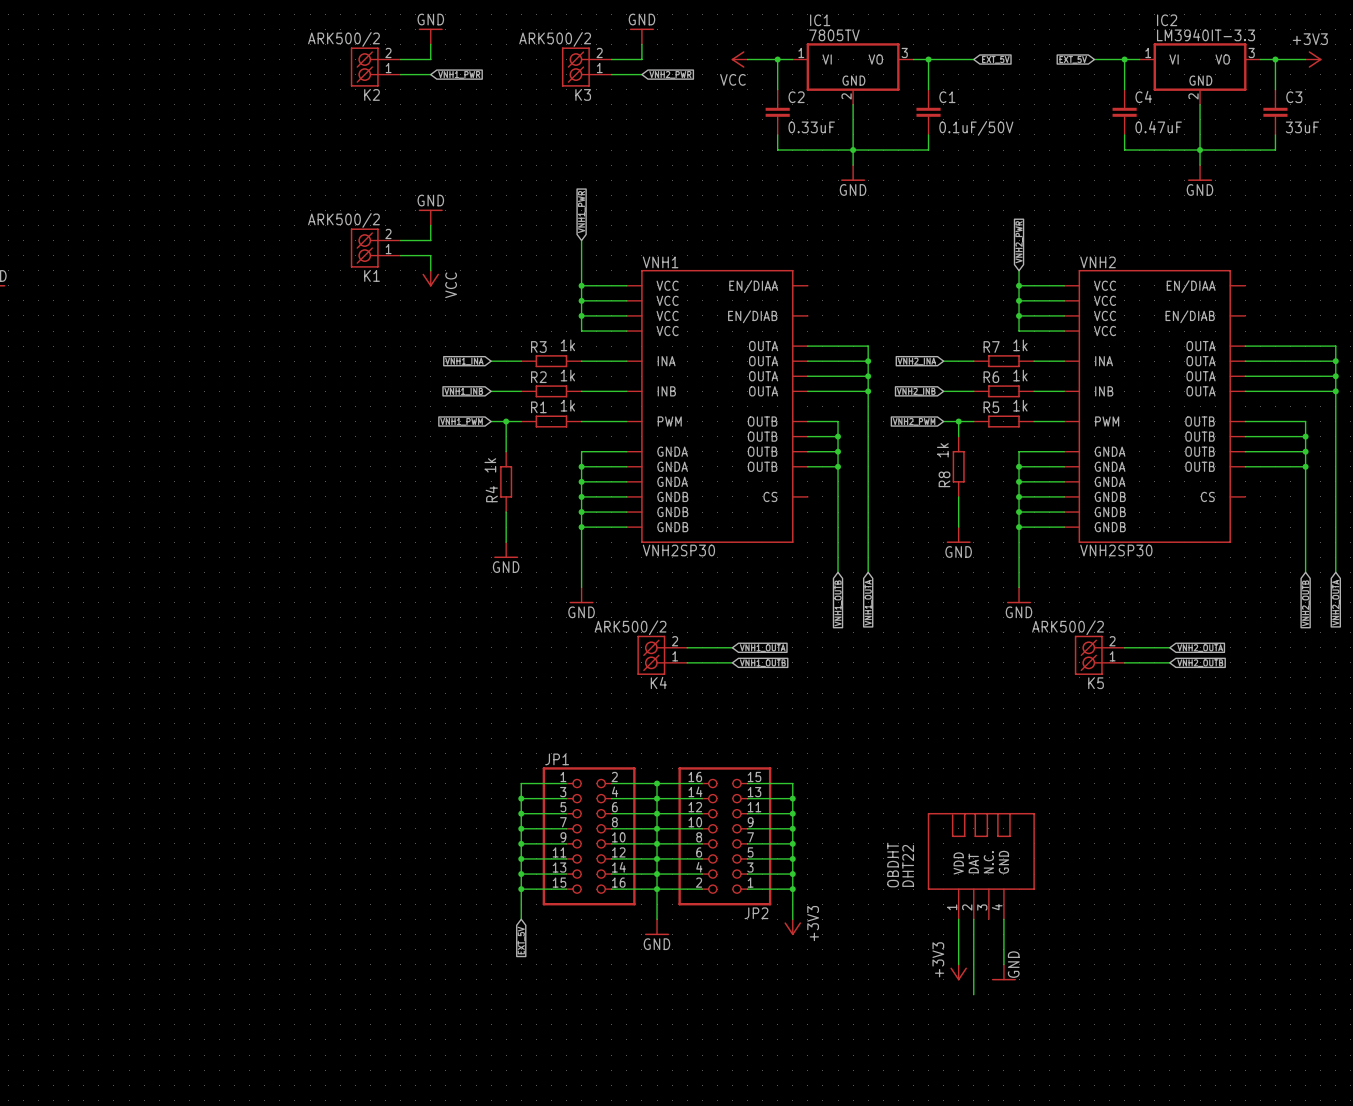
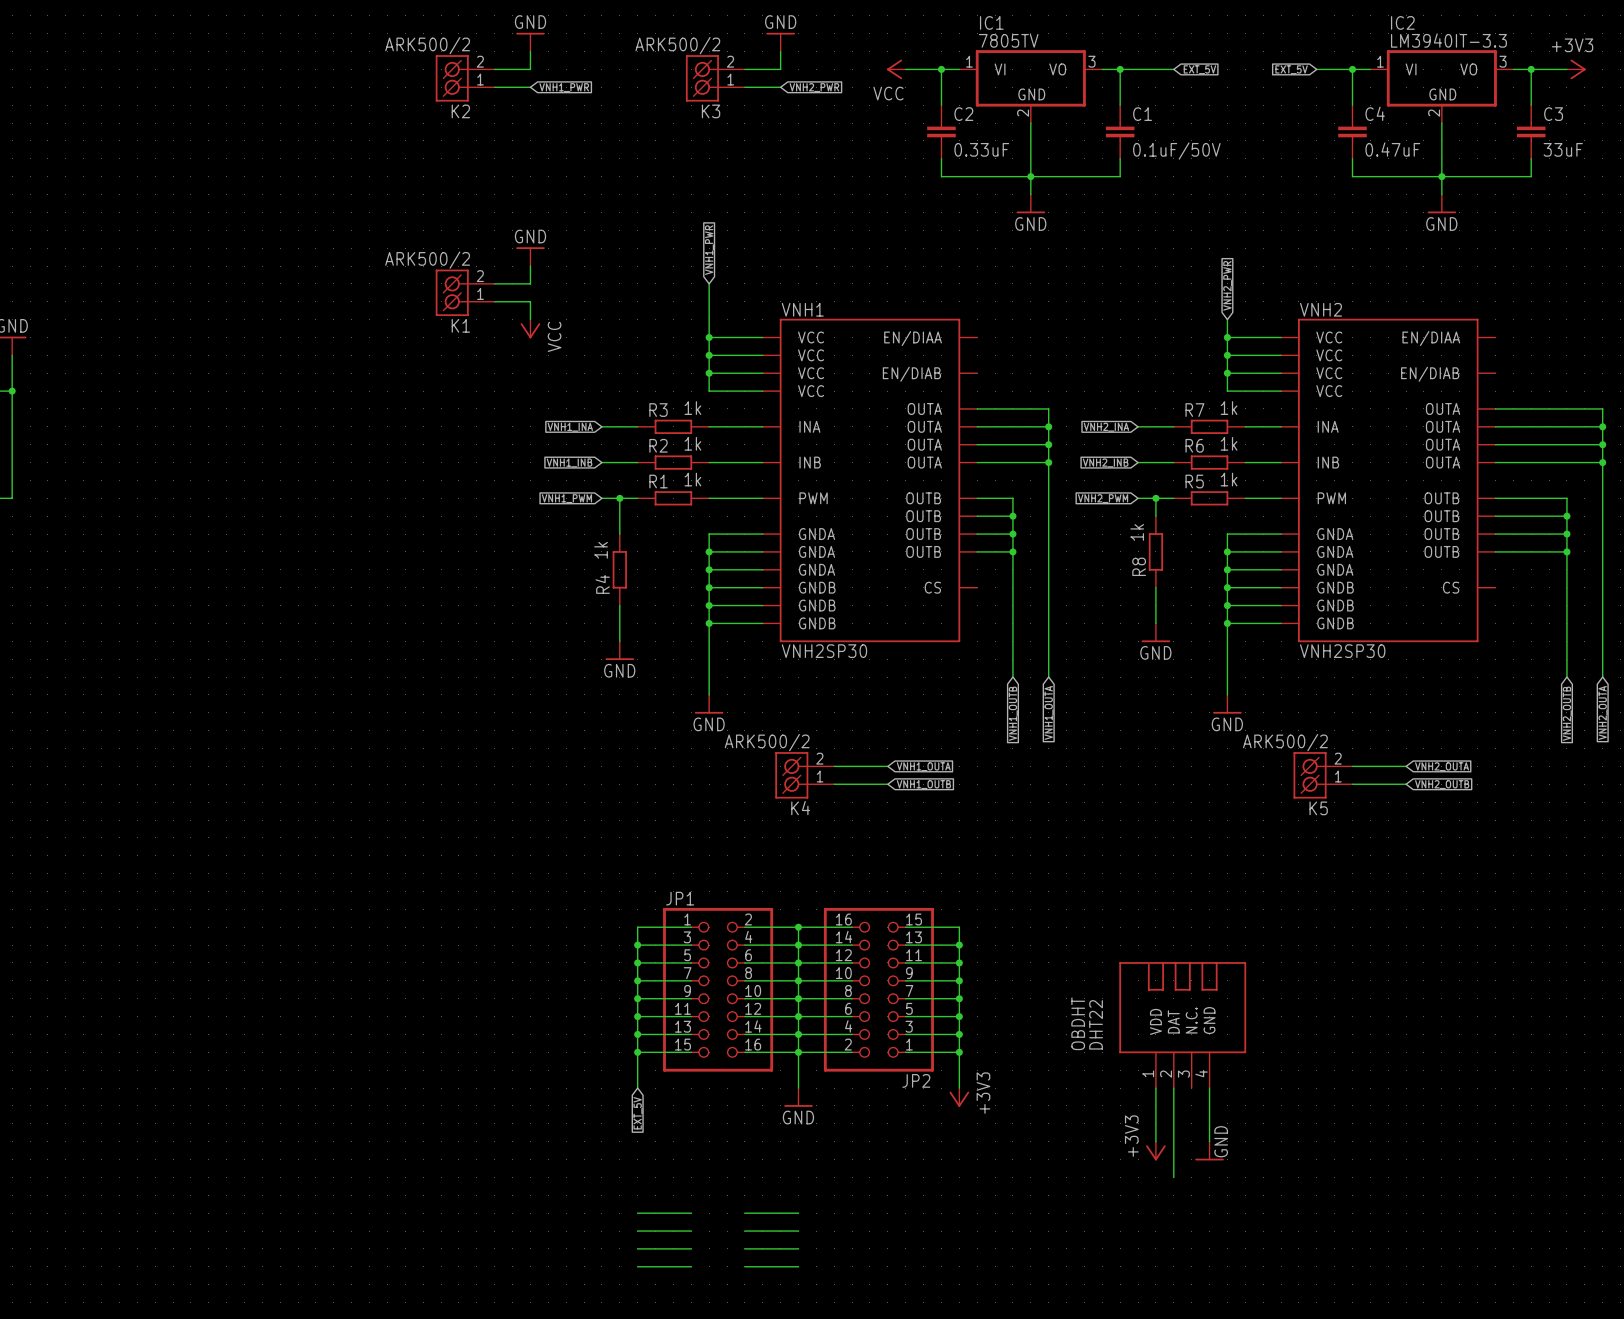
wire: none -> (637, 1213) (691, 1213)
wire: none -> (744, 1213) (798, 1213)
wire: none -> (637, 1231) (691, 1231)
wire: none -> (744, 1231) (798, 1231)
wire: none -> (637, 1248) (691, 1248)
wire: none -> (744, 1248) (798, 1248)
wire: none -> (637, 1266) (691, 1266)
wire: none -> (744, 1266) (798, 1266)

